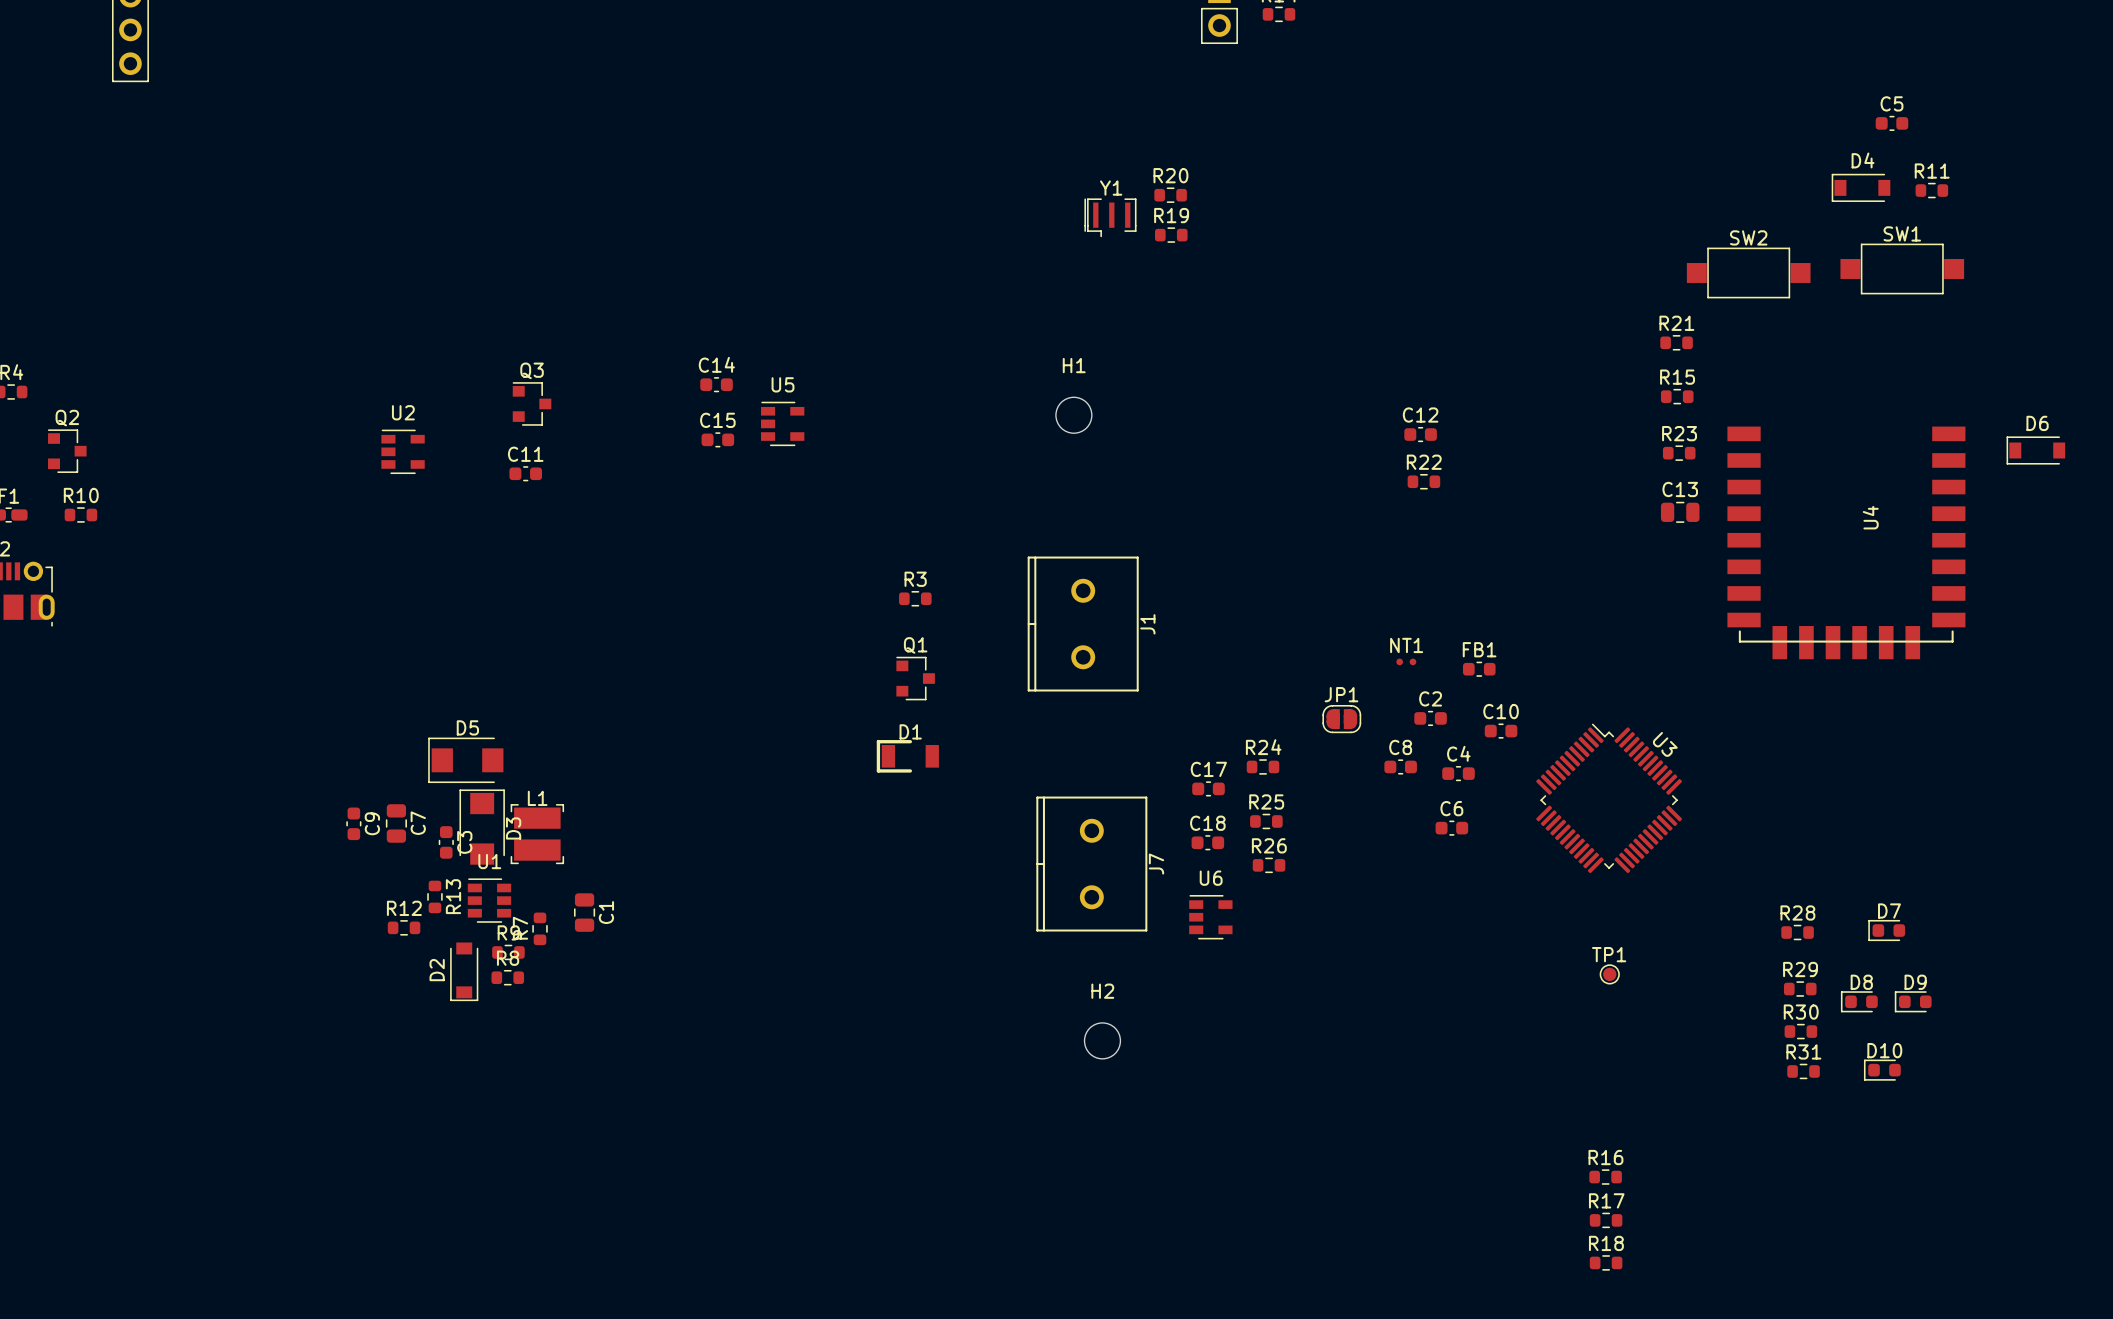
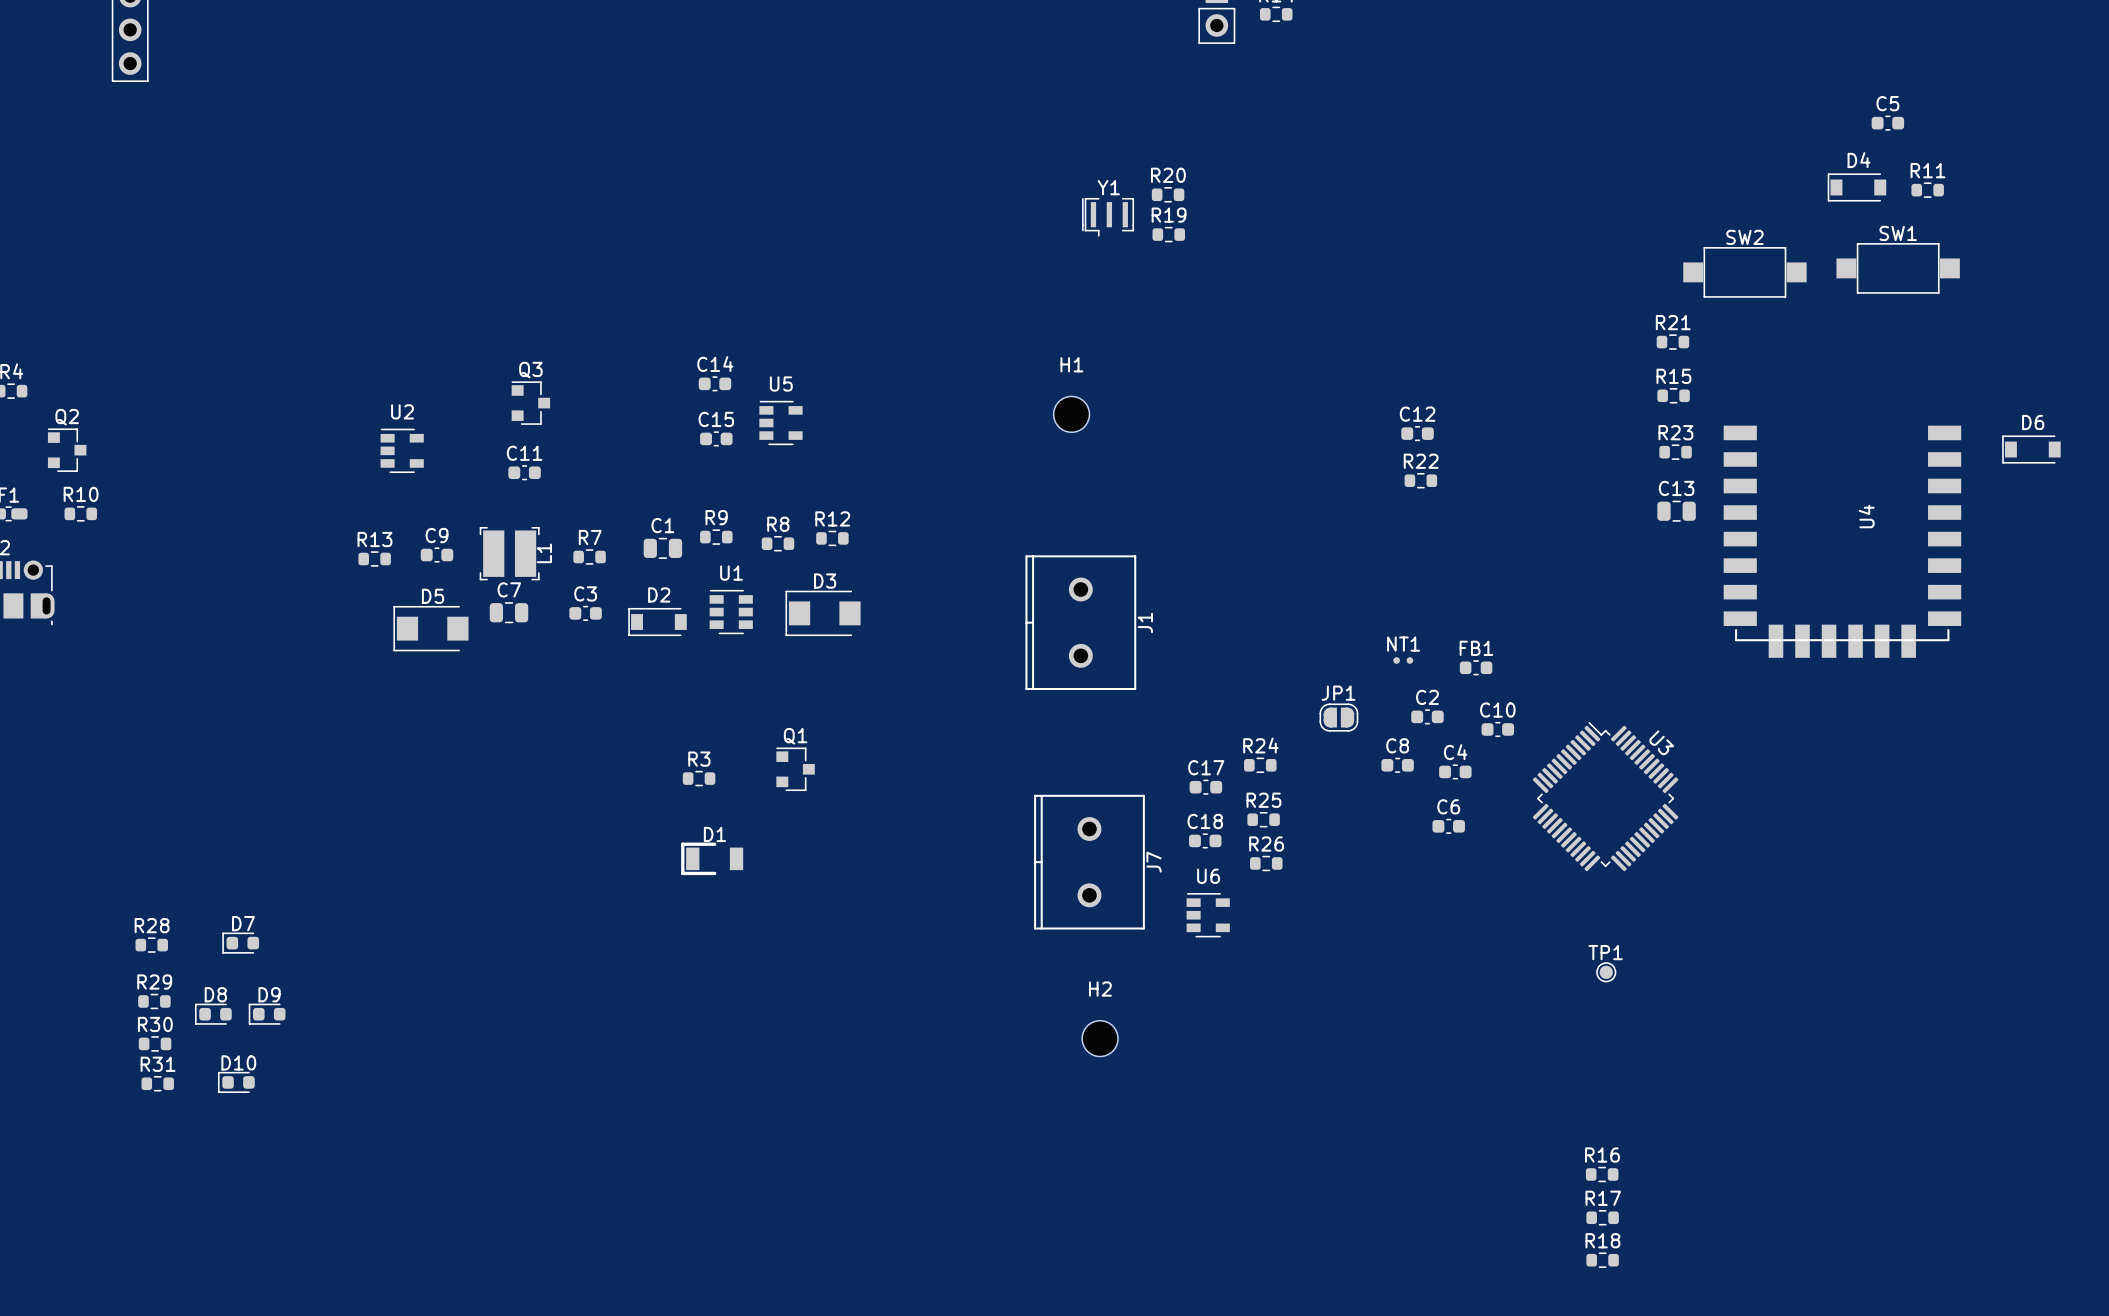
R3 position: (915, 598) -> (699, 778)
Q1 position: (915, 678) -> (795, 769)
D1 position: (907, 756) -> (712, 858)
D5 position: (465, 760) -> (430, 628)
C9 rotation: 0° (353, 823) -> 90° clockwise (437, 555)
C9 position: (353, 823) -> (437, 555)
C9 name position: C9 (372, 823) -> C9 (437, 535)
C7 rotation: 0° (396, 823) -> 90° clockwise (508, 612)
C7 position: (396, 823) -> (508, 612)
C7 name position: C7 (418, 823) -> C7 (509, 589)
D3 rotation: 0° (482, 827) -> 90° counterclockwise (823, 613)
D3 position: (482, 827) -> (823, 613)
L1 rotation: 0° (537, 834) -> 90° clockwise (509, 553)
L1 position: (537, 834) -> (509, 553)
C3 rotation: 0° (446, 842) -> 90° clockwise (585, 613)
C3 position: (446, 842) -> (585, 613)
C3 name position: C3 (464, 842) -> C3 (585, 593)
R13 rotation: 0° (434, 896) -> 90° clockwise (374, 558)
R13 position: (434, 896) -> (374, 558)
R13 name position: R13 (453, 896) -> R13 (374, 539)
U1 position: (489, 900) -> (731, 612)
C1 rotation: 0° (584, 912) -> 90° clockwise (662, 548)
C1 position: (584, 912) -> (662, 548)
C1 name position: C1 (606, 912) -> C1 (662, 525)
R12 position: (404, 927) -> (832, 538)
R7 rotation: 0° (540, 928) -> 90° clockwise (589, 556)
R7 position: (540, 928) -> (589, 556)
D7 position: (1886, 930) -> (240, 943)
R28 position: (1797, 932) -> (151, 945)
R9 position: (508, 952) -> (716, 537)
D2 rotation: 0° (464, 971) -> 90° clockwise (657, 622)
D2 position: (464, 971) -> (657, 622)
R8 position: (507, 977) -> (778, 543)
R29 position: (1800, 989) -> (154, 1001)
D8 position: (1859, 1001) -> (213, 1014)
D9 position: (1913, 1001) -> (267, 1014)
R30 position: (1800, 1031) -> (155, 1043)
D10 position: (1882, 1070) -> (236, 1082)
R31 position: (1803, 1071) -> (157, 1083)

